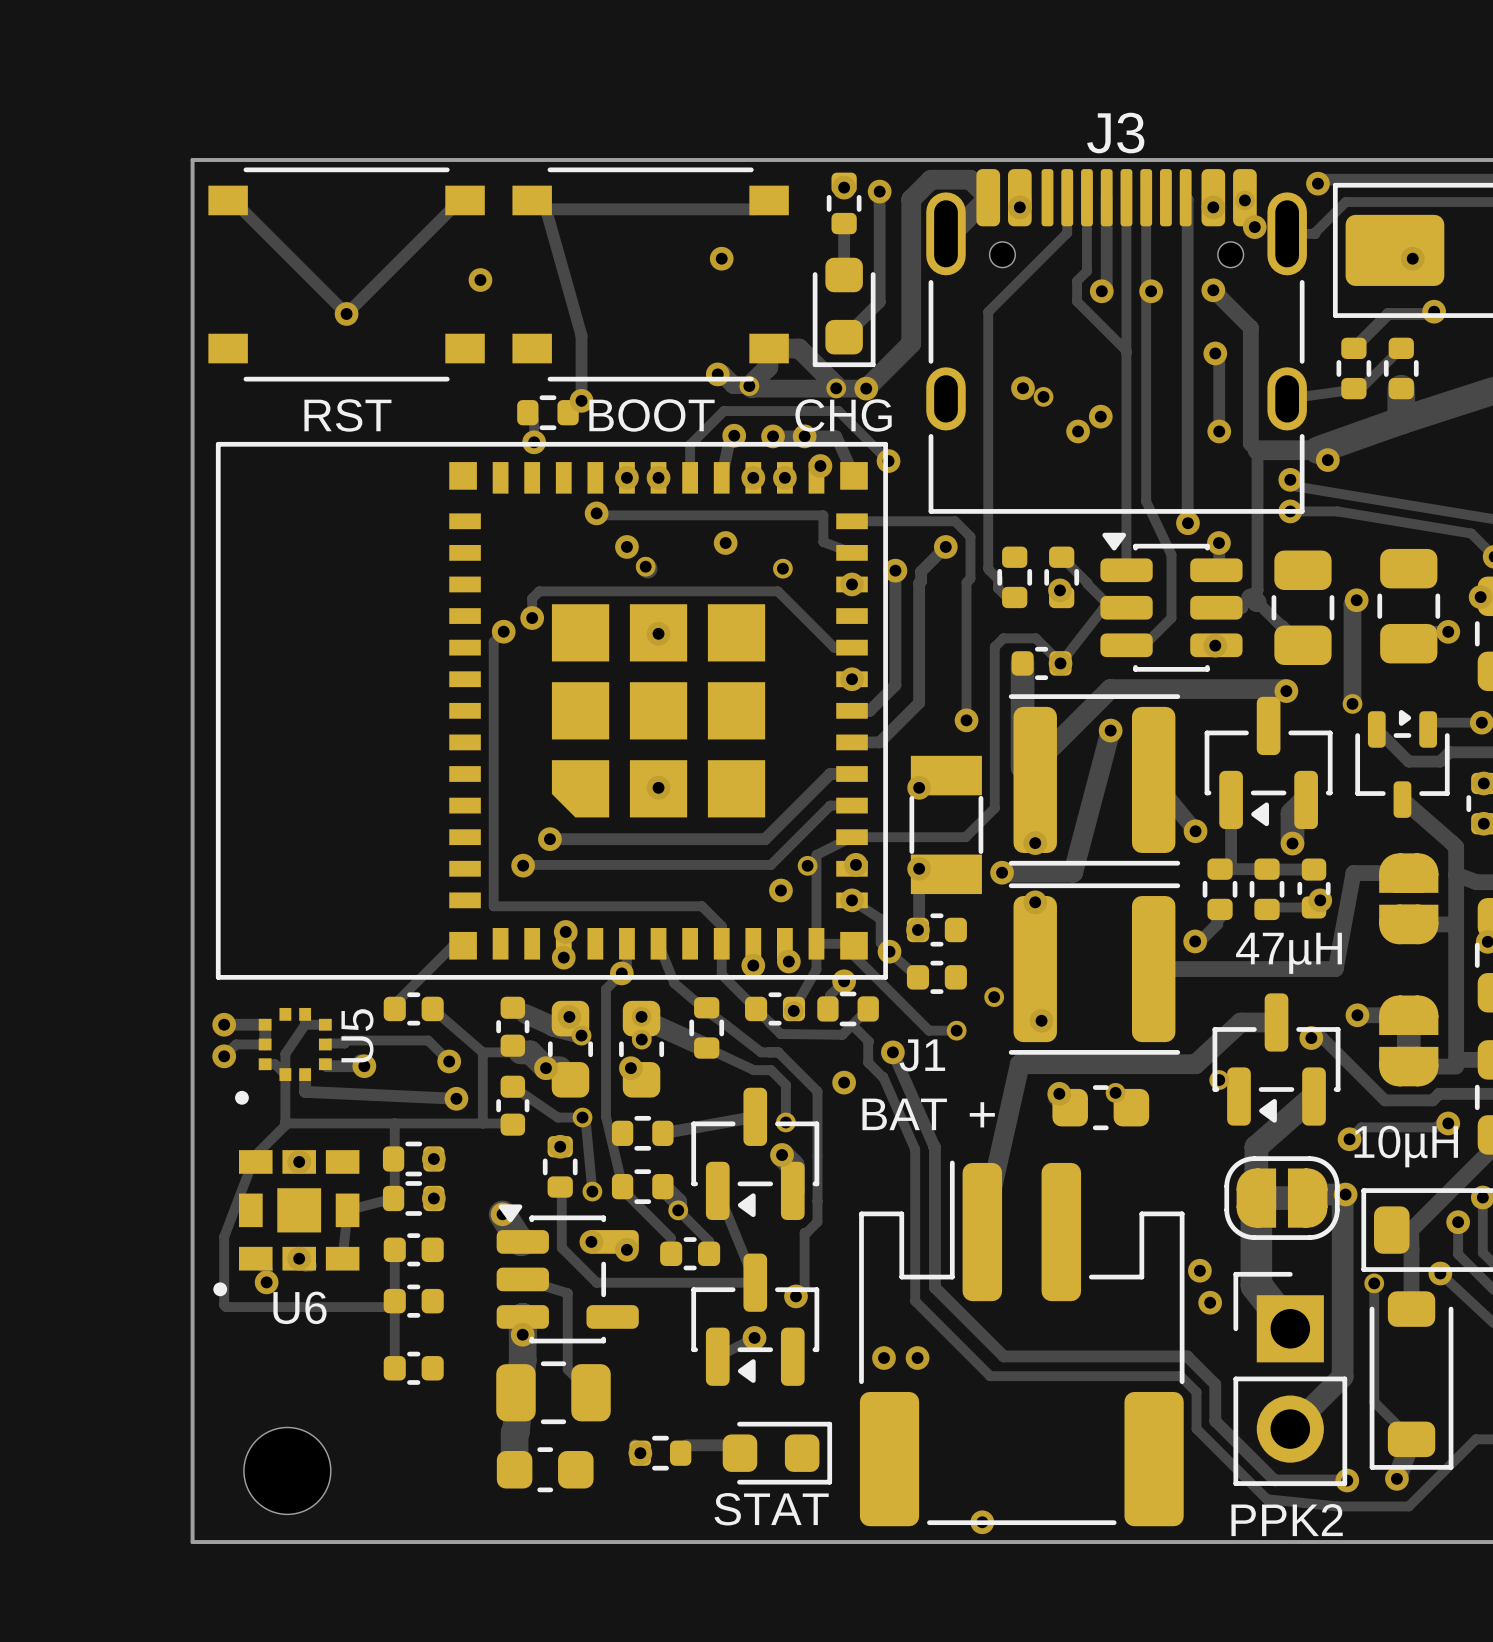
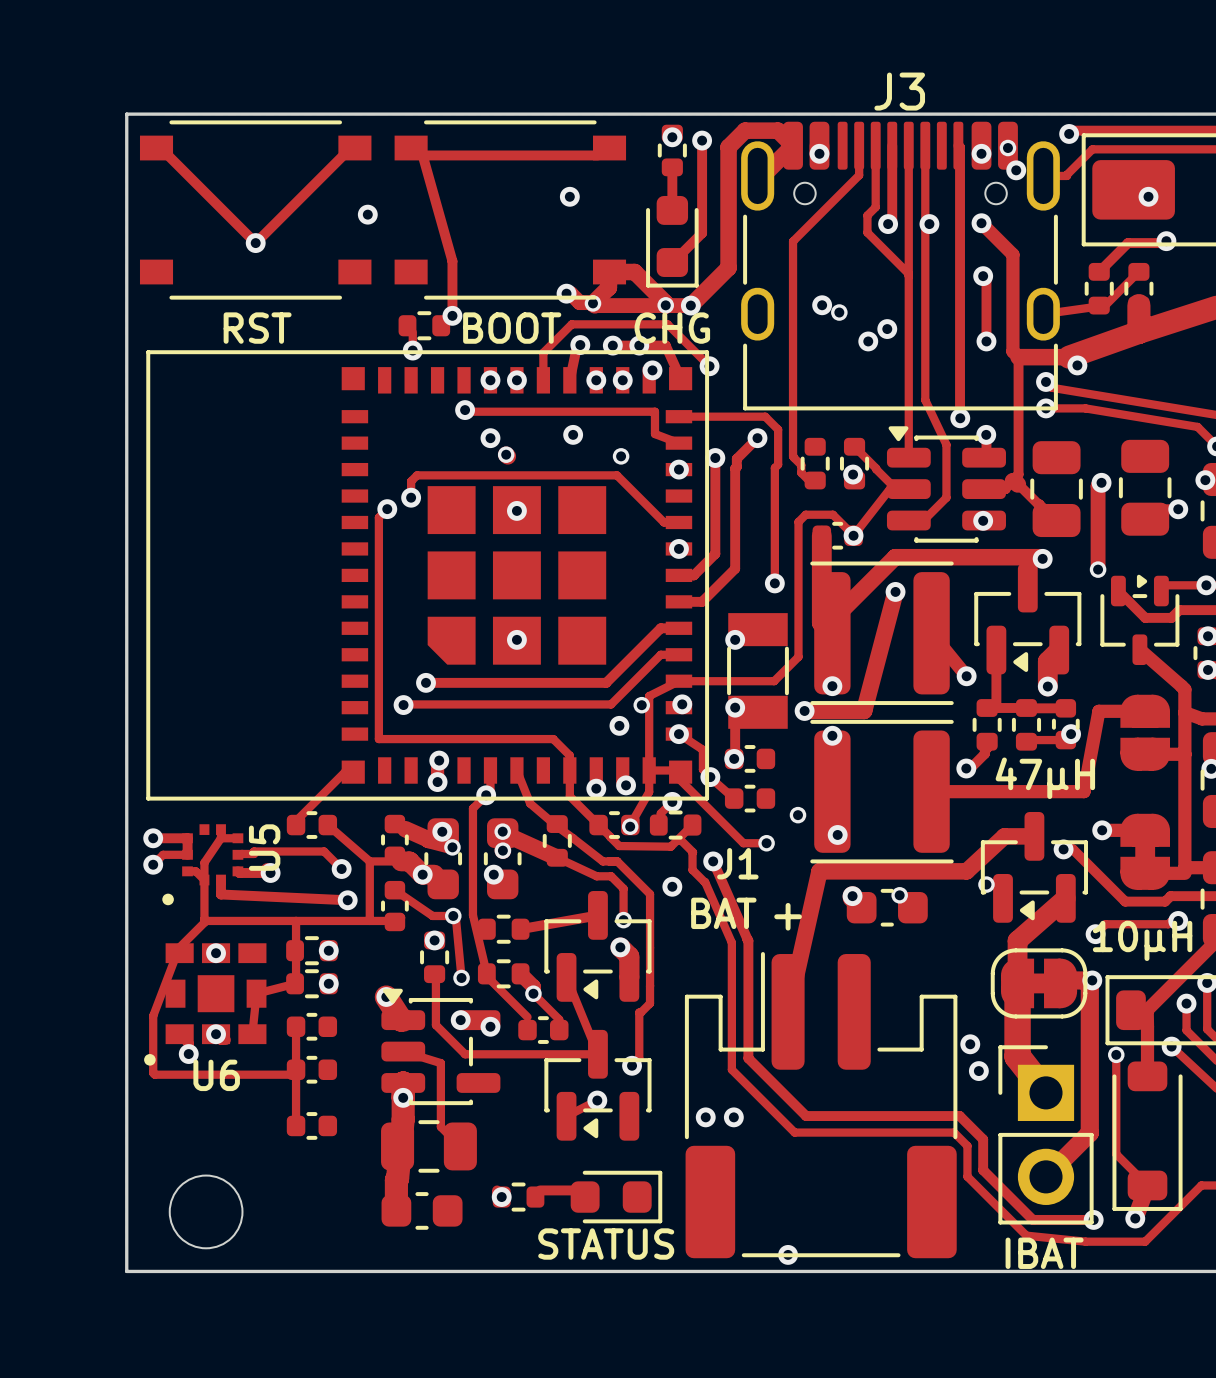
text: STAT (771, 1509) -> STATUS (606, 1244)
text: PPK2 (1287, 1520) -> IBAT (1044, 1253)

